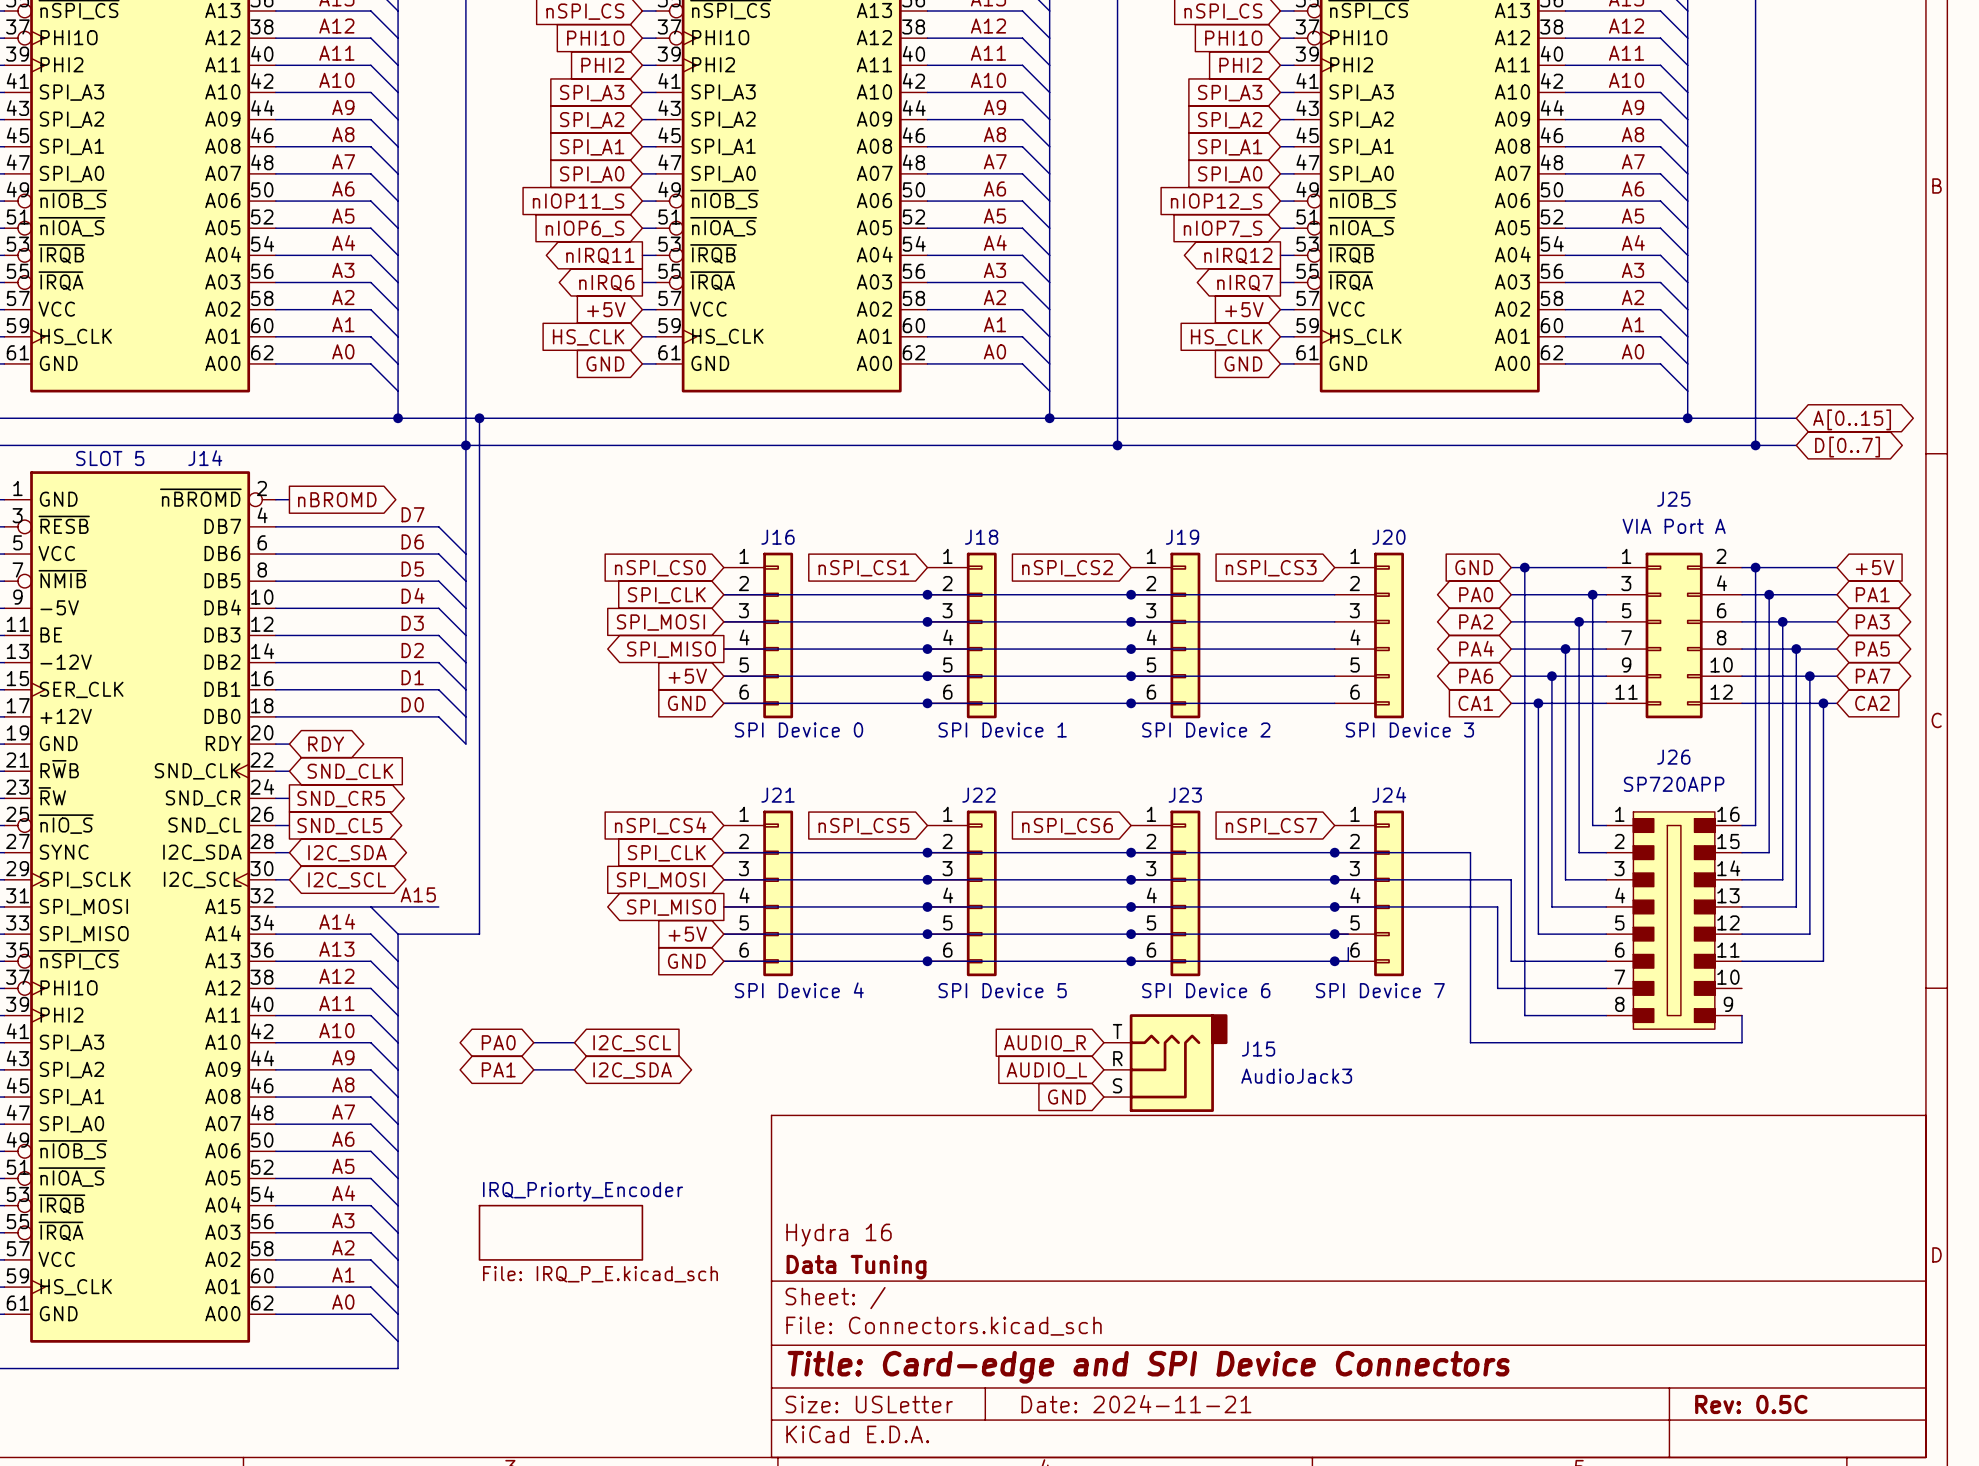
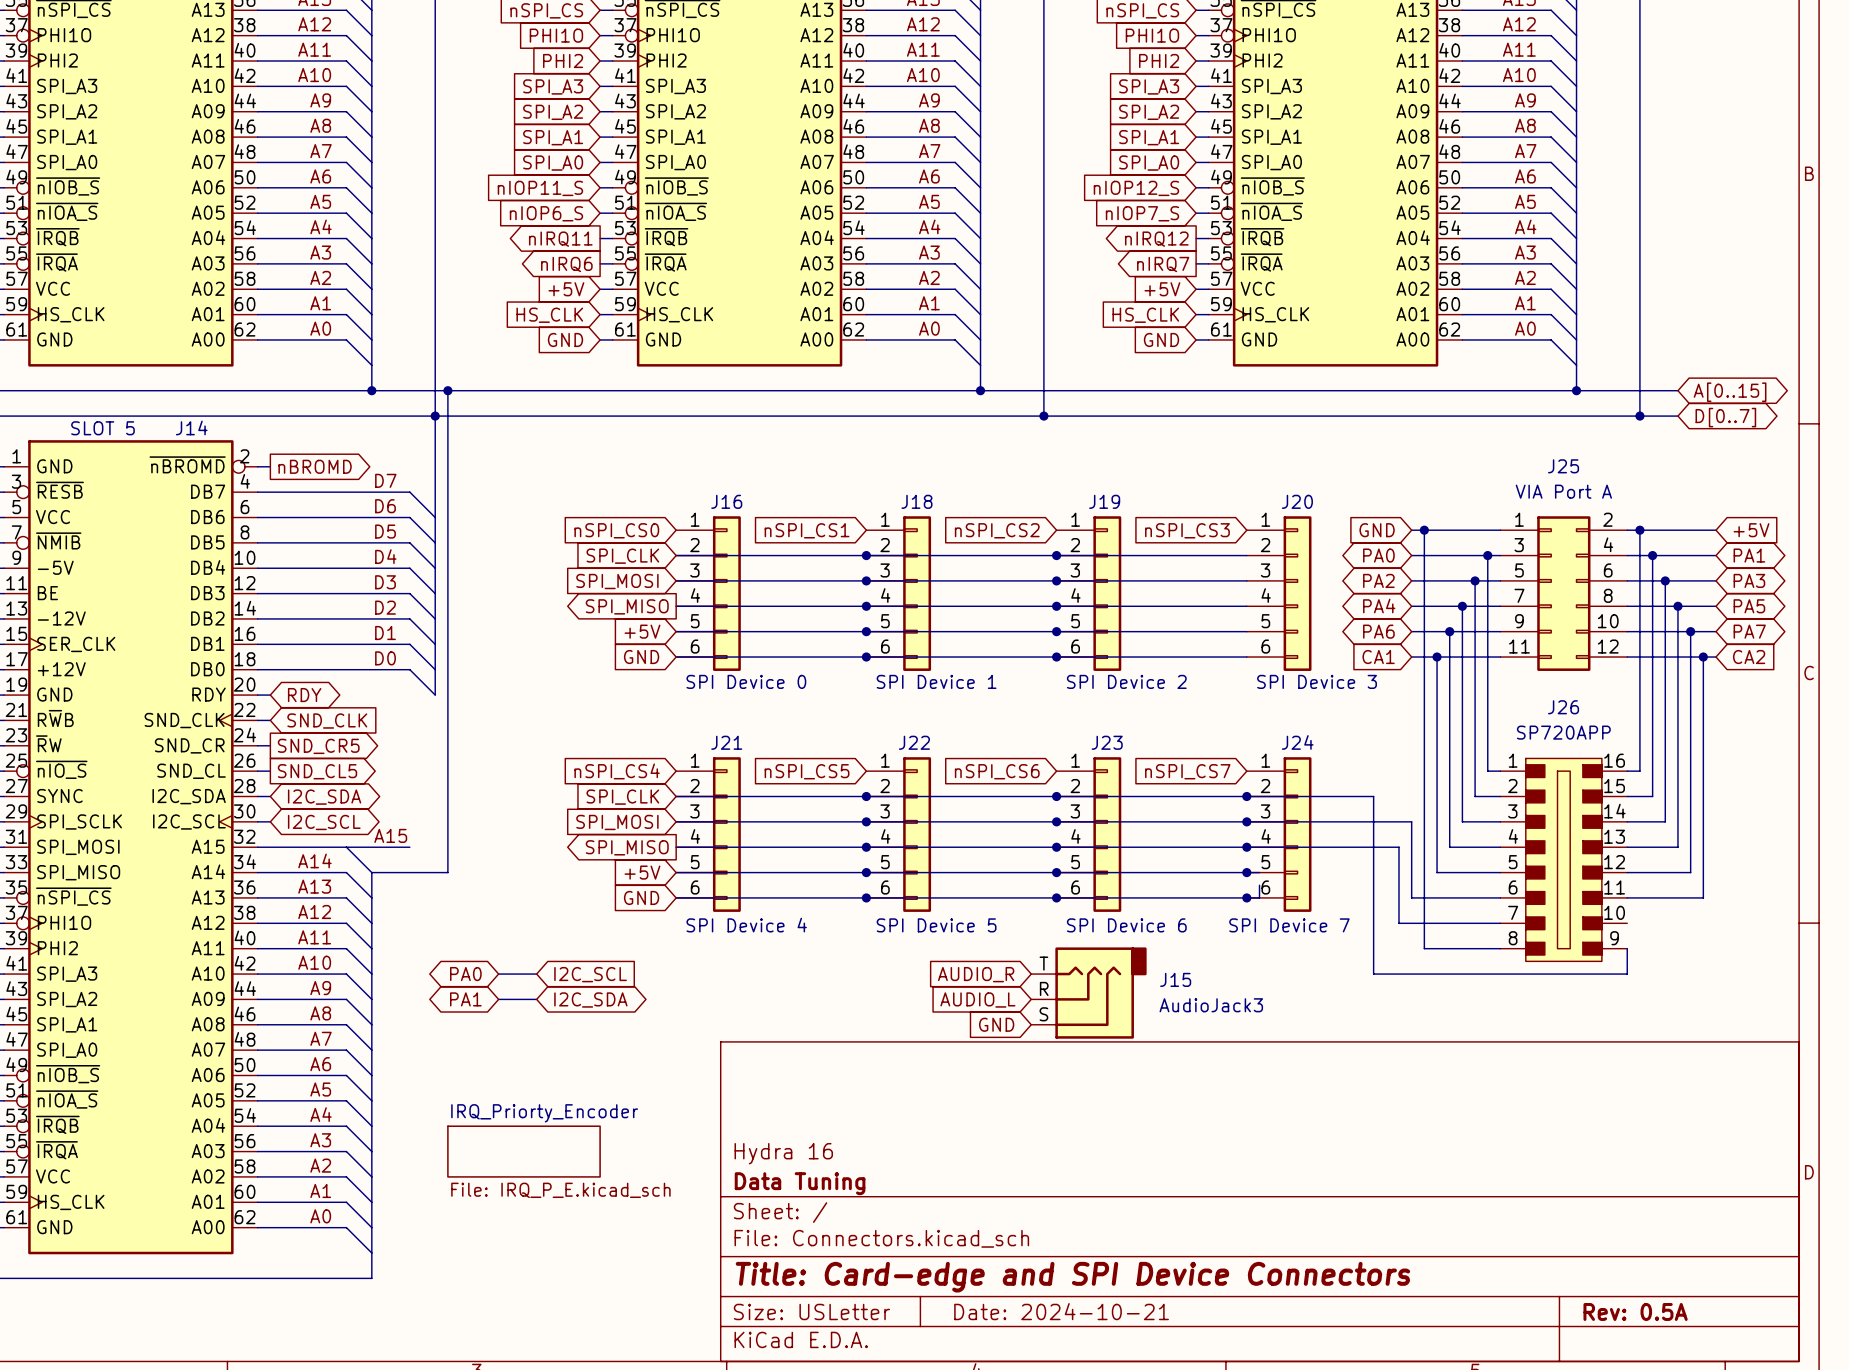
title block: Date: 2024-11-21 (1136, 1404) -> Date: 2024-10-21 (1061, 1311)
title block: Rev: 0.5C (1751, 1404) -> Rev: 0.5A (1635, 1311)

